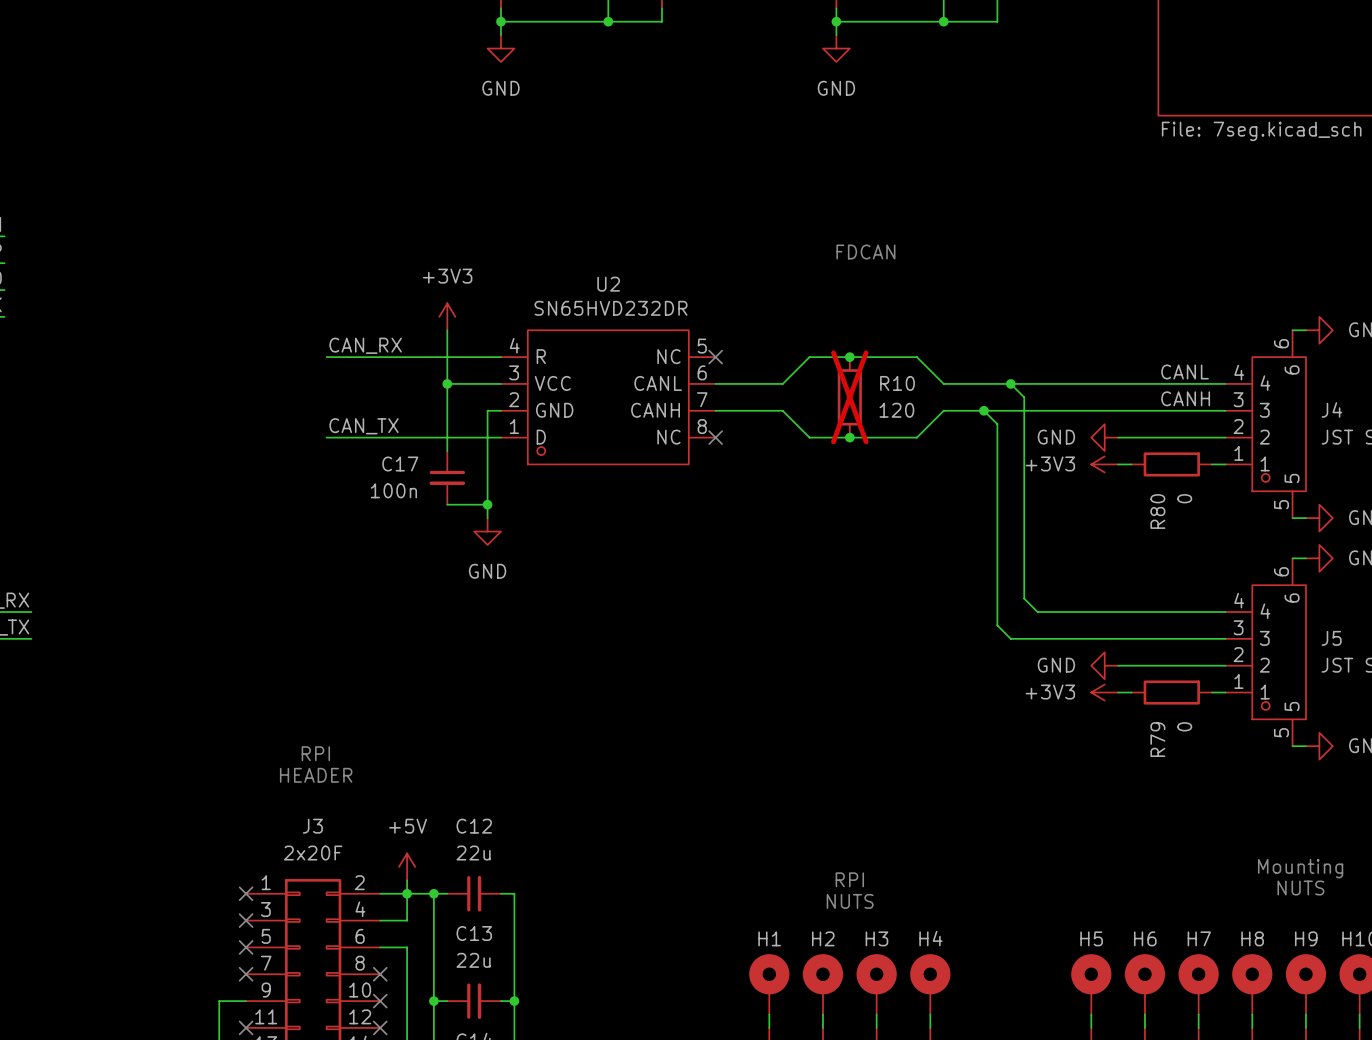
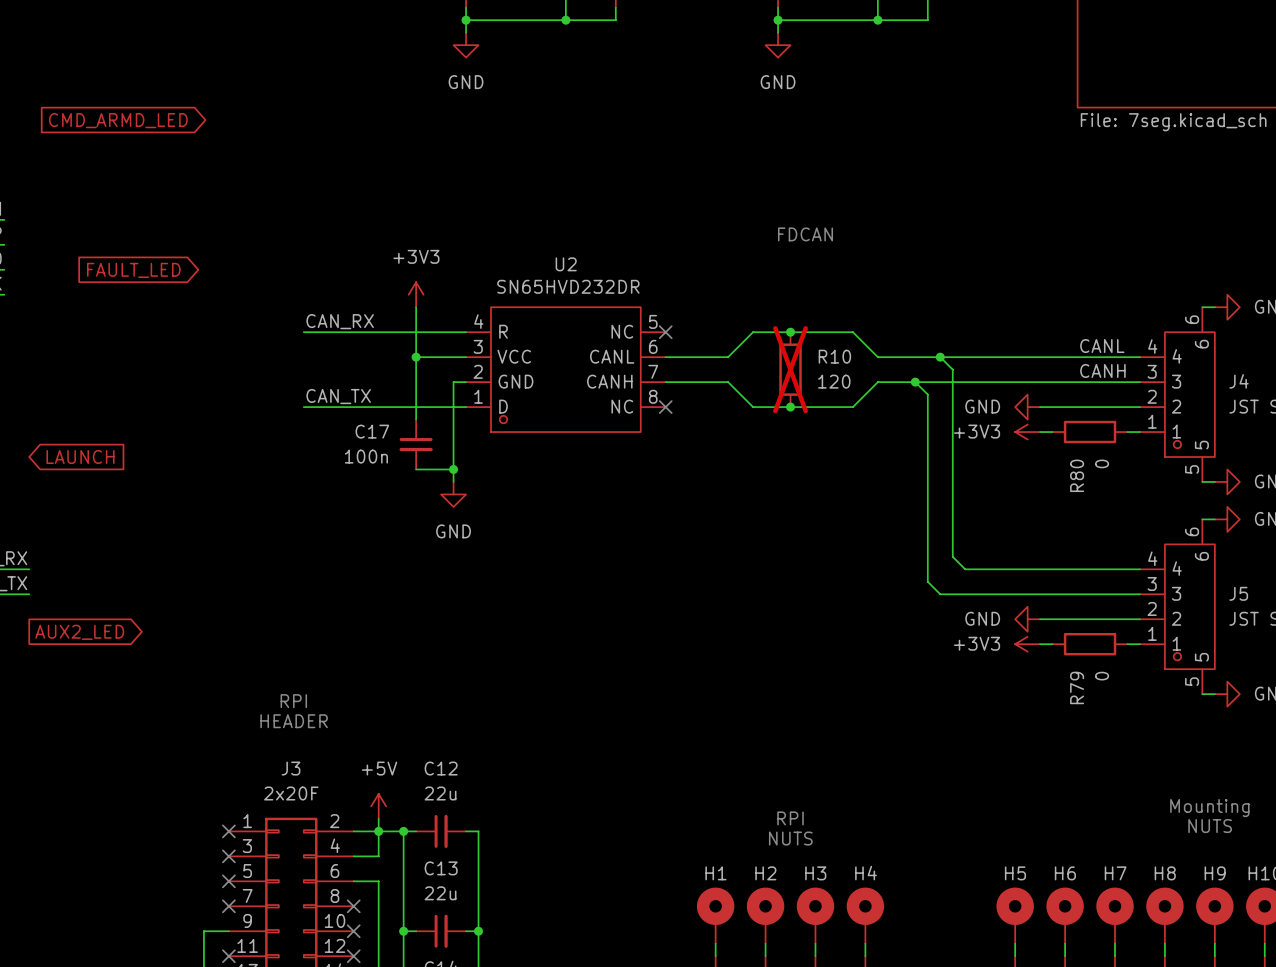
global label: none -> CMD_ARMD_LED (118, 120)
global label: none -> FAULT_LED (133, 270)
global label: none -> LAUNCH (80, 457)
global label: none -> AUX2_LED (79, 632)

